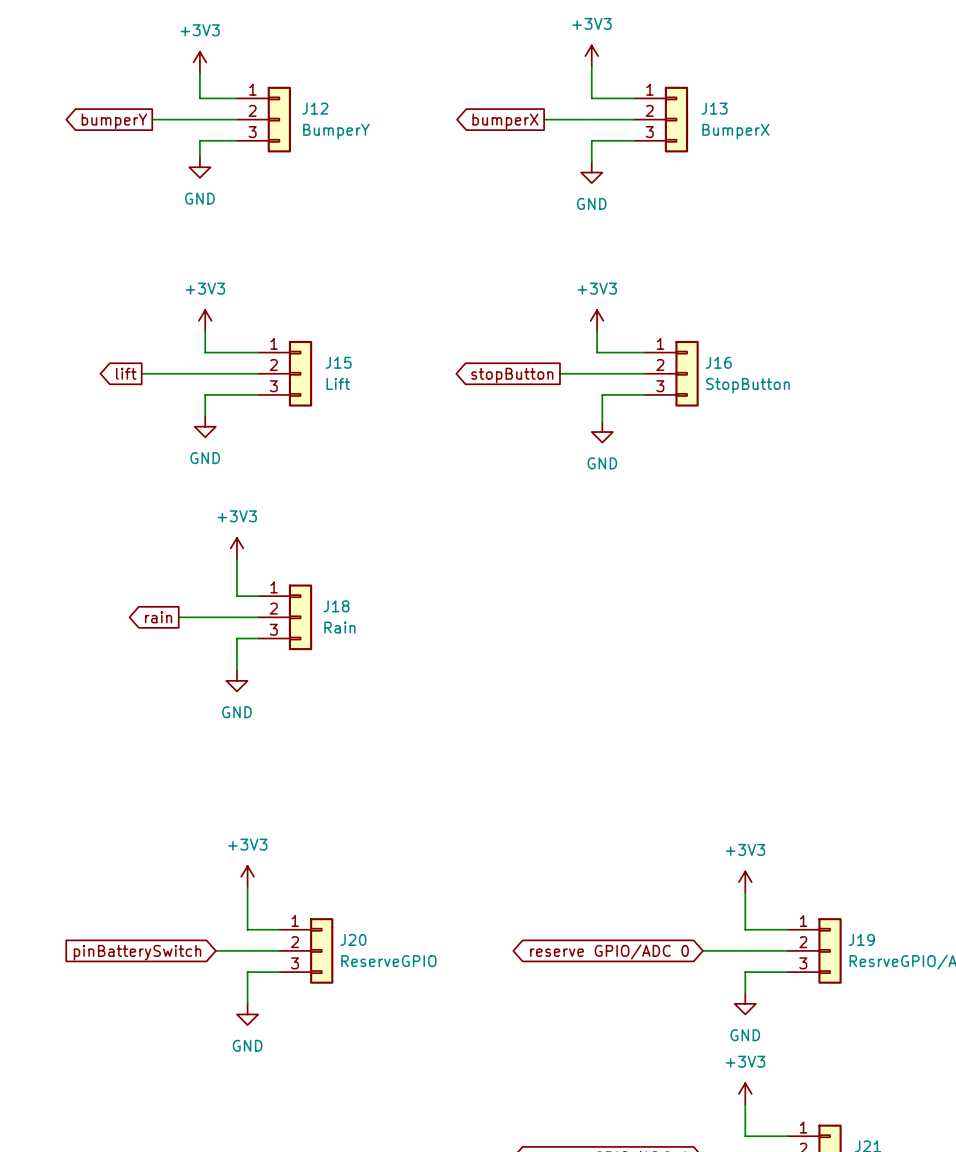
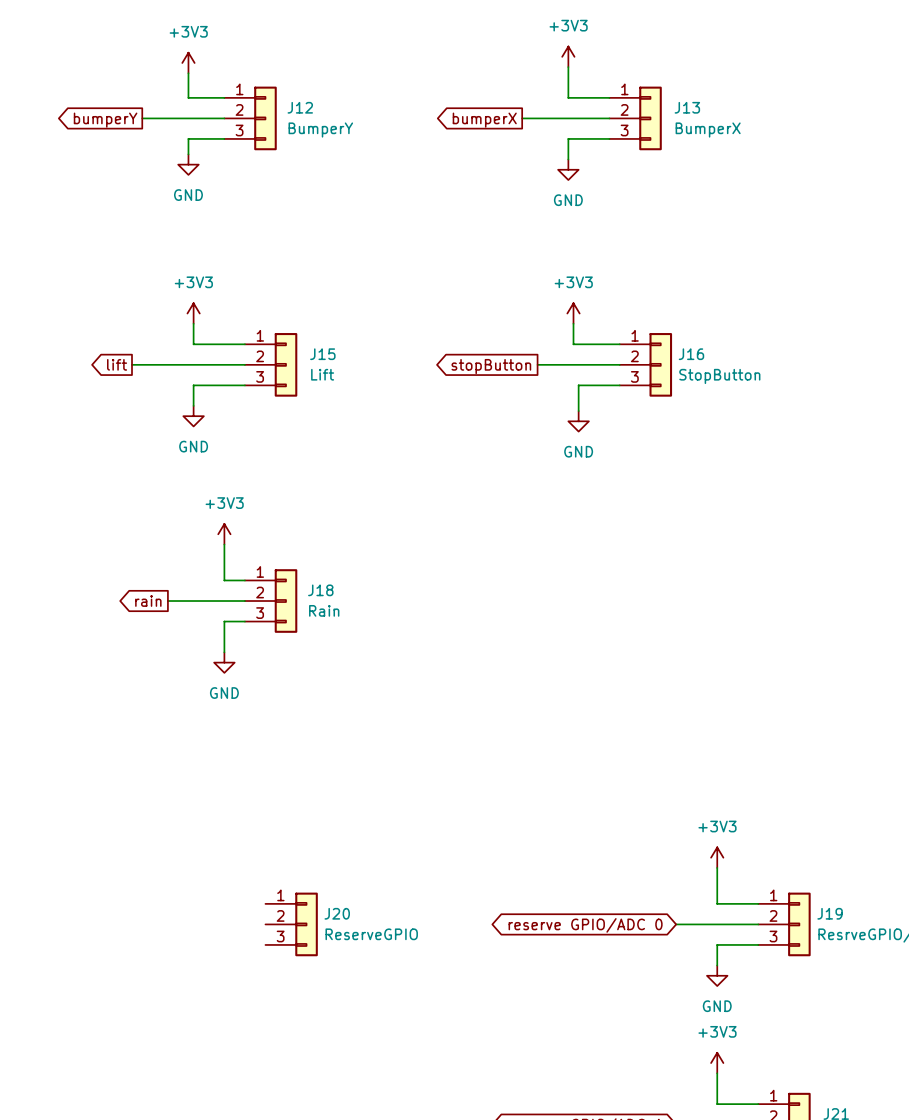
power symbol: +3V3 (247, 876) -> none
wire: (247, 887) (247, 929) (279, 929) -> none
wire: (215, 950) (279, 950) -> none
global label: pinBatterySwitch (137, 952) -> none
wire: (279, 972) (247, 972) (247, 1003) -> none
power symbol: GND (247, 1014) -> none

